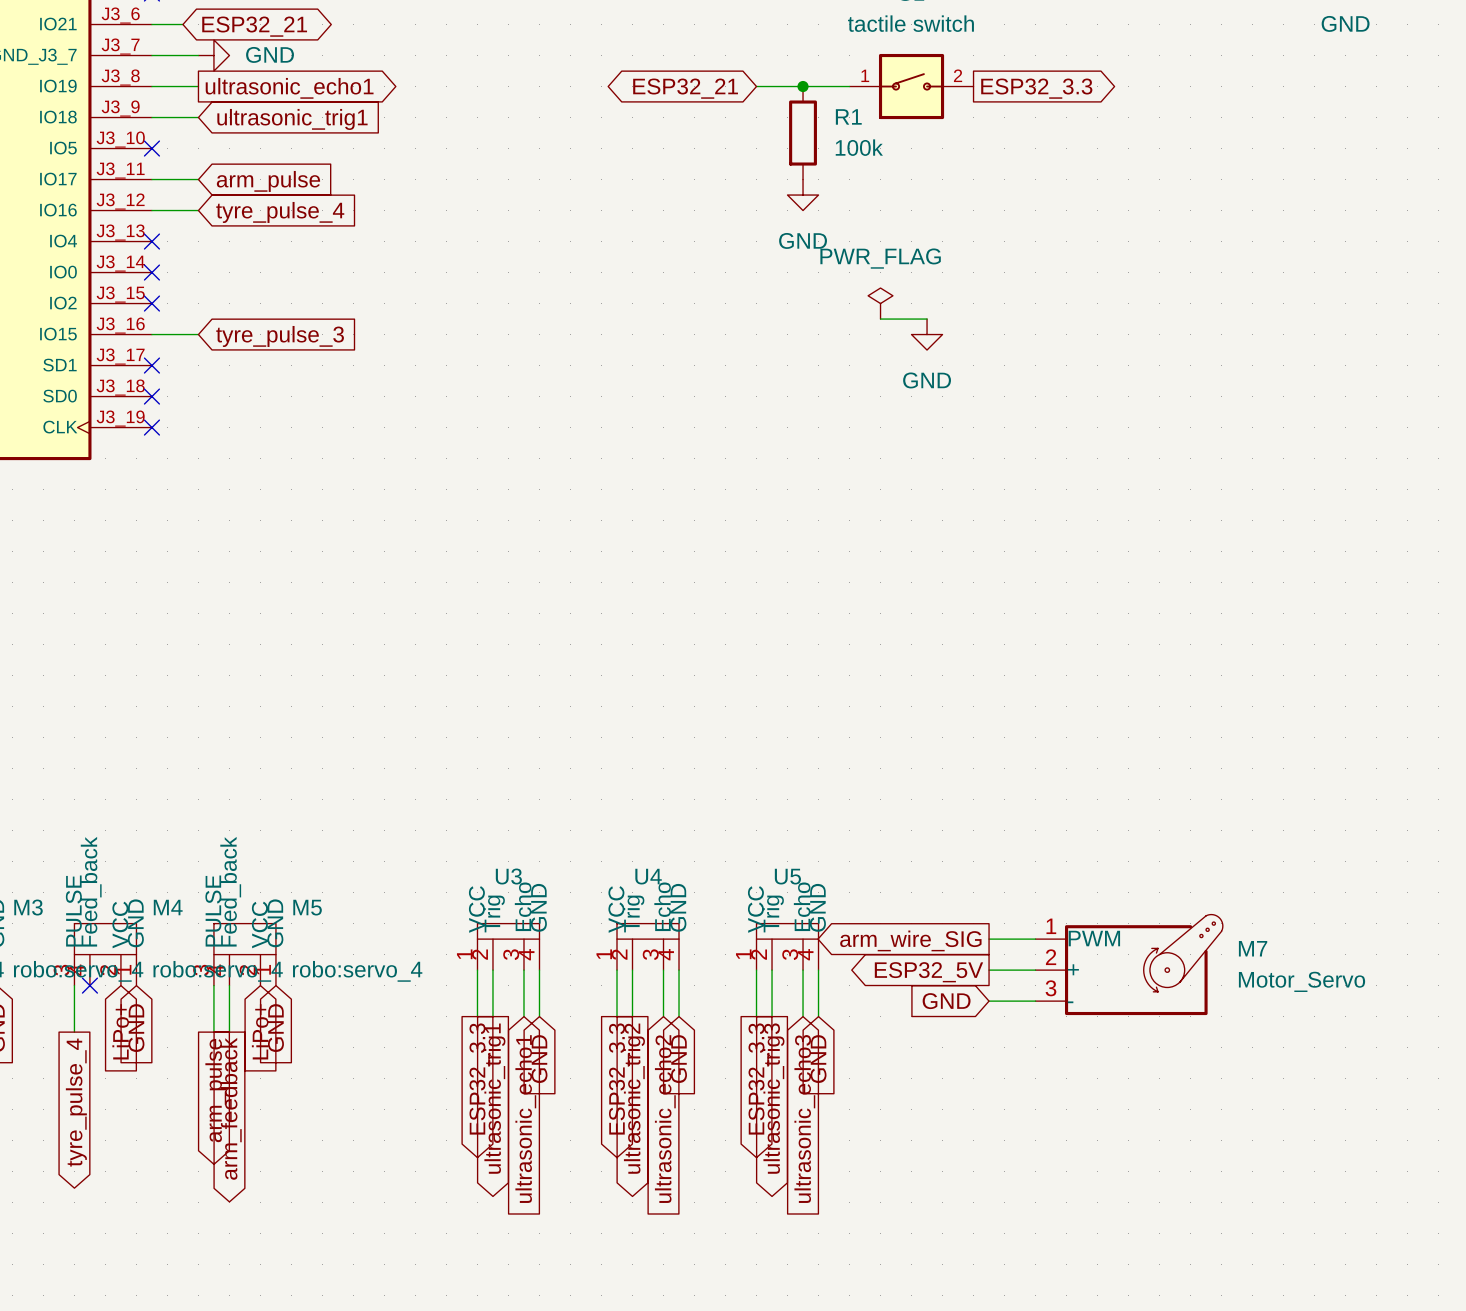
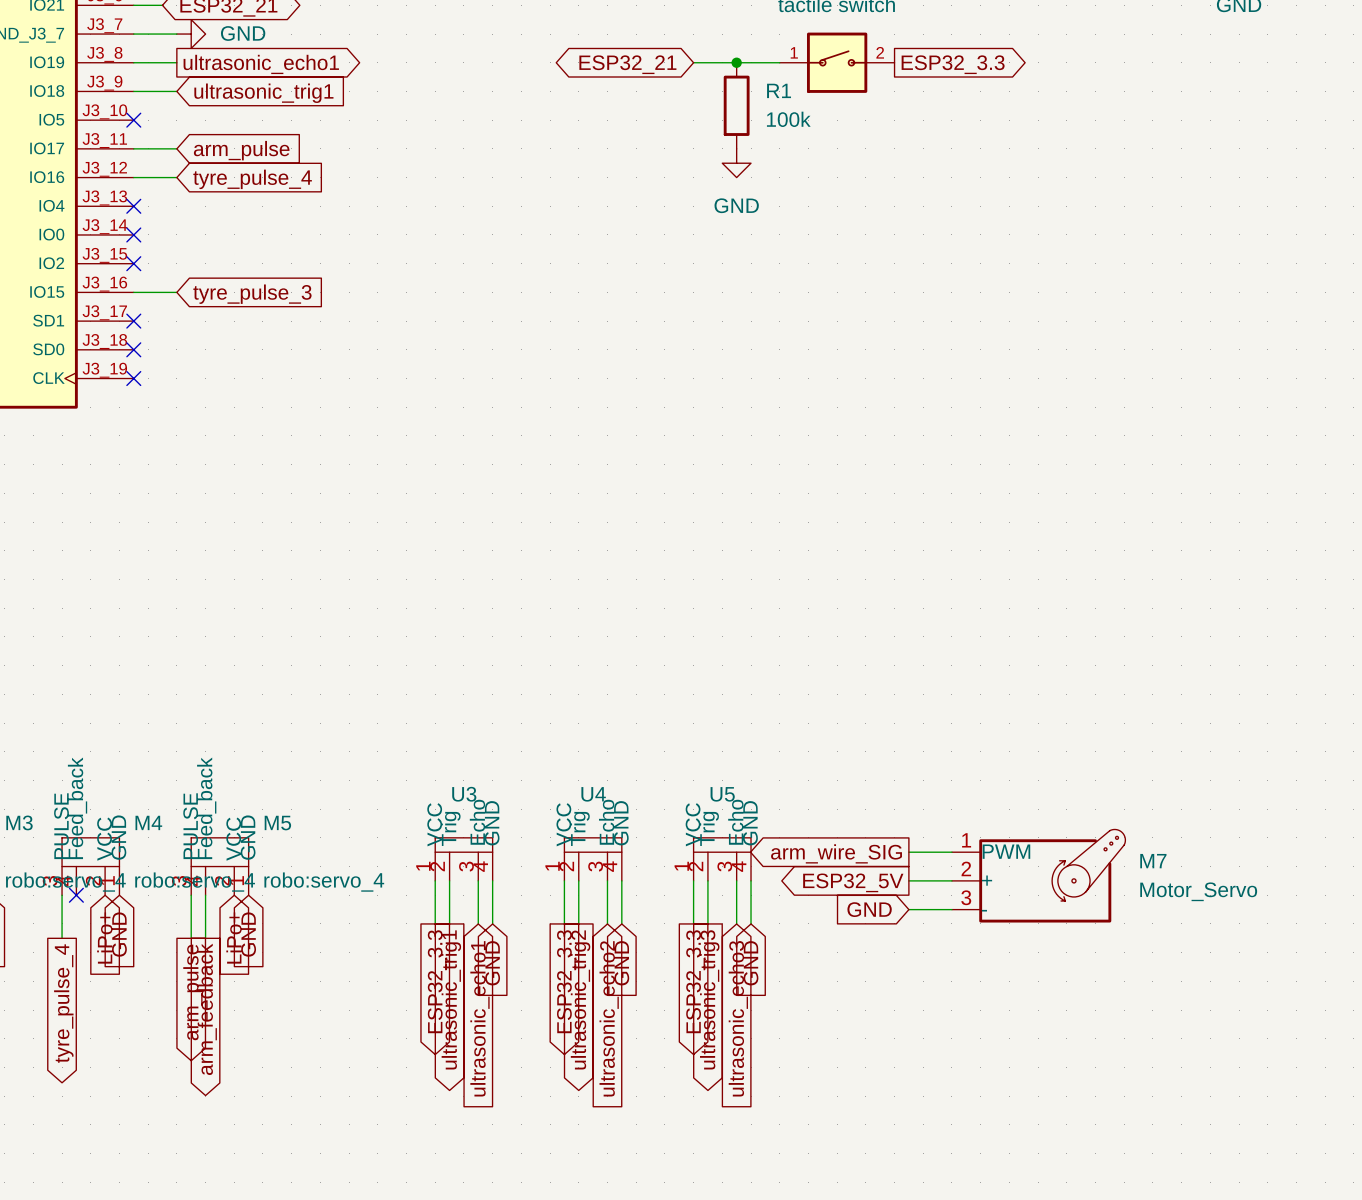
power symbol: PWR_FLAG (880, 303) -> none
wire: (880, 319) (927, 319) -> none
power symbol: GND (927, 334) -> none

